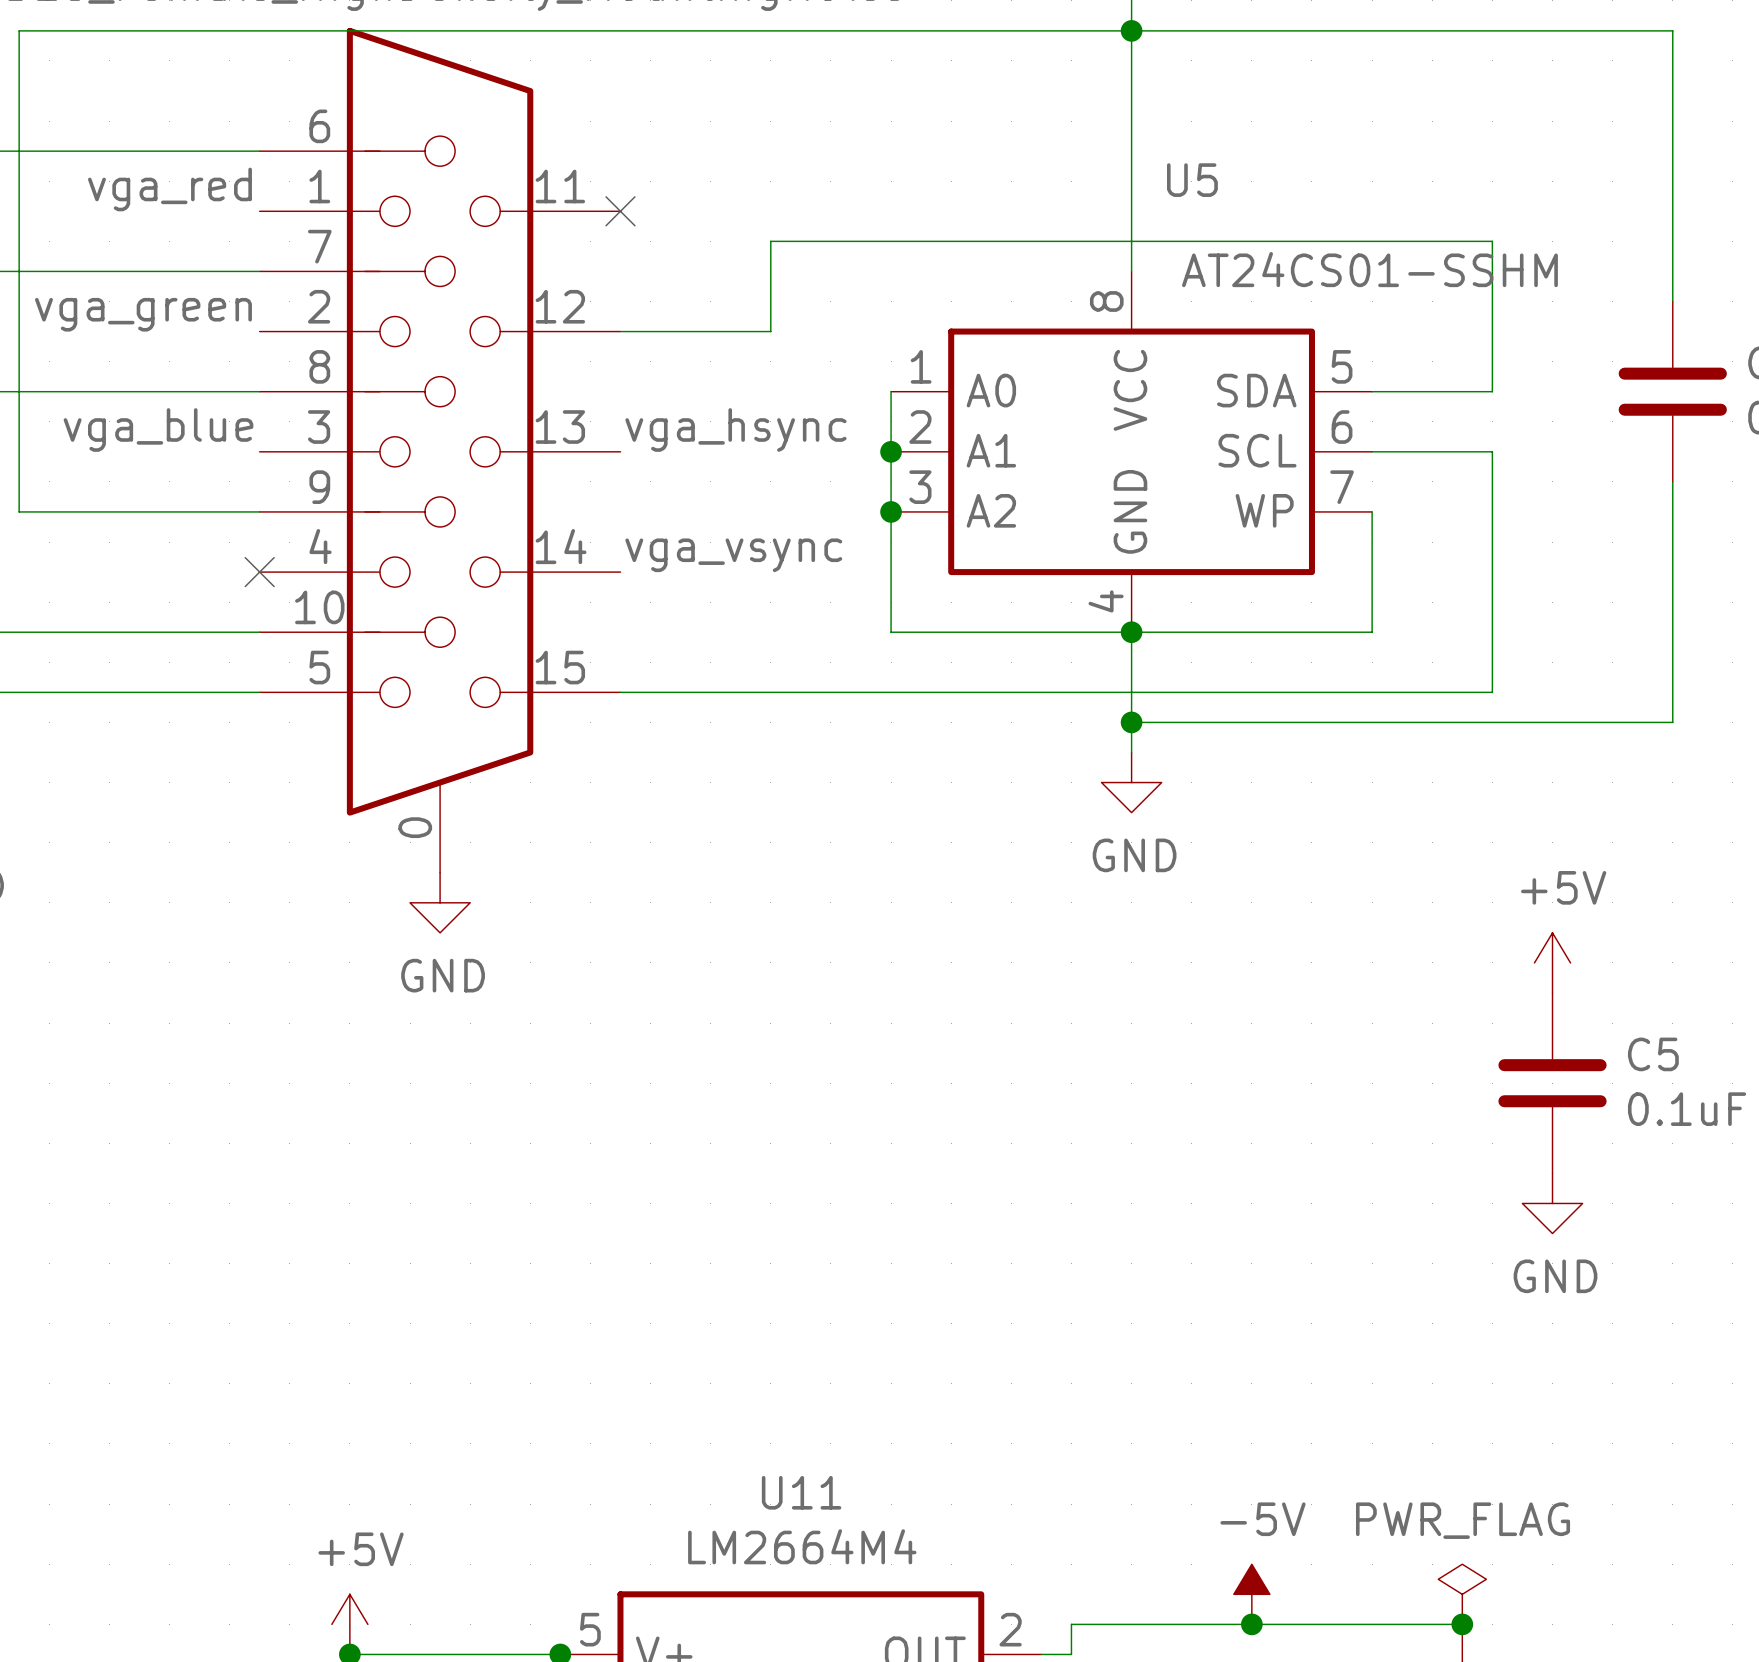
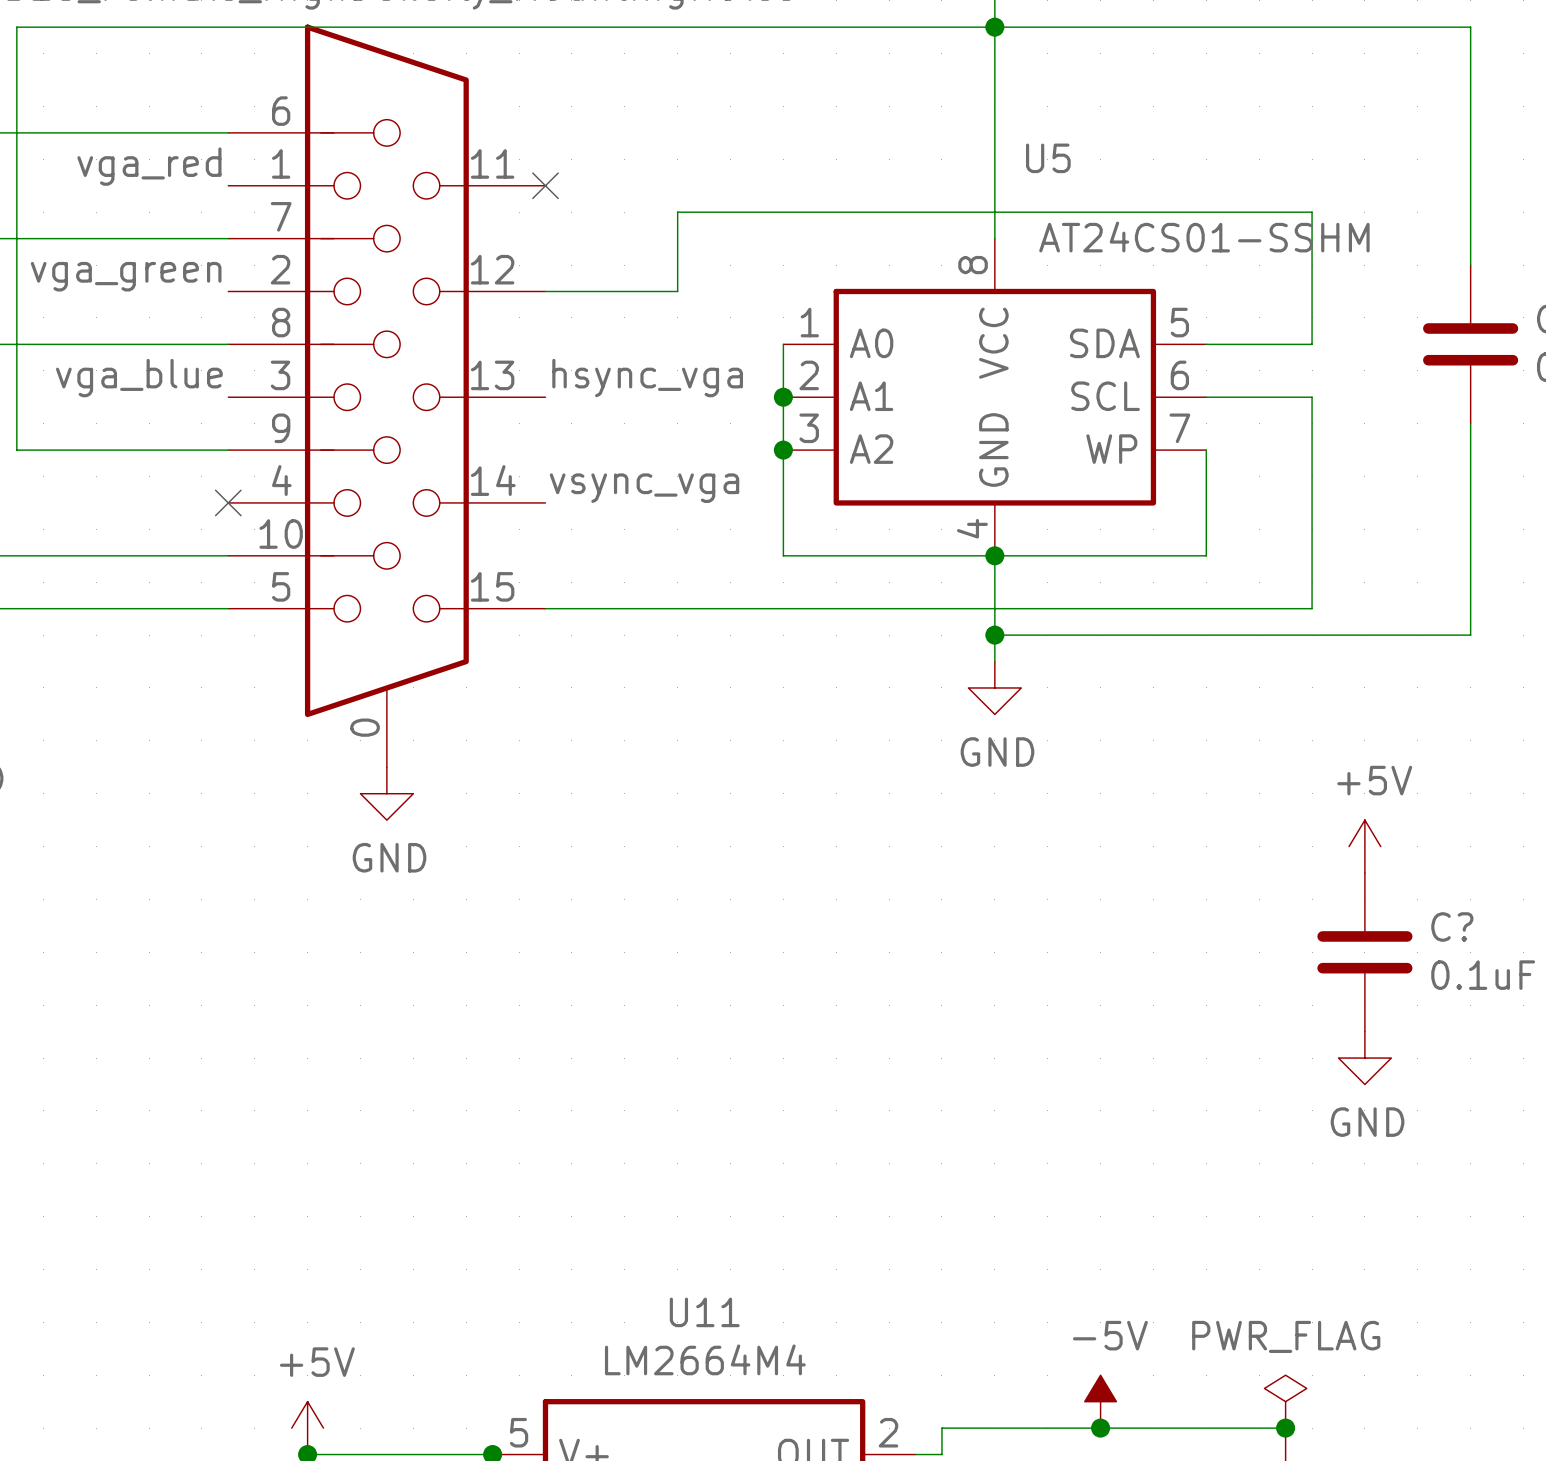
label: vga_hsync (735, 430) -> hsync_vga (647, 378)
label: vga_vsync (733, 555) -> vsync_vga (644, 488)
C5 name: C5 (1653, 1054) -> C? (1452, 927)

